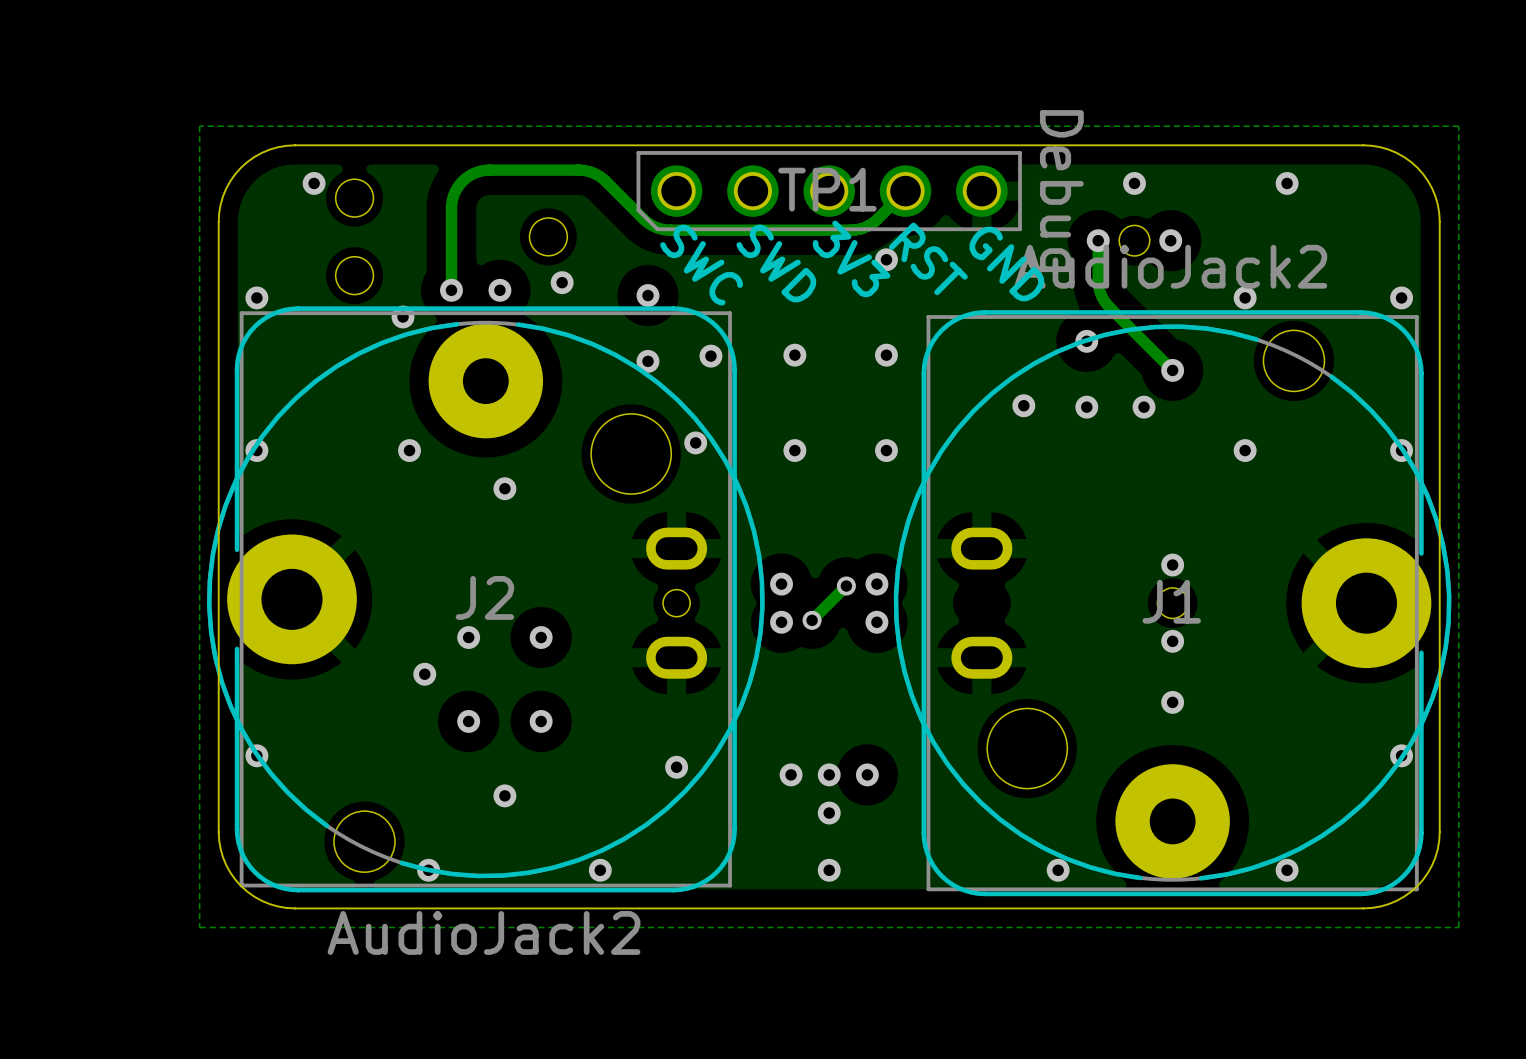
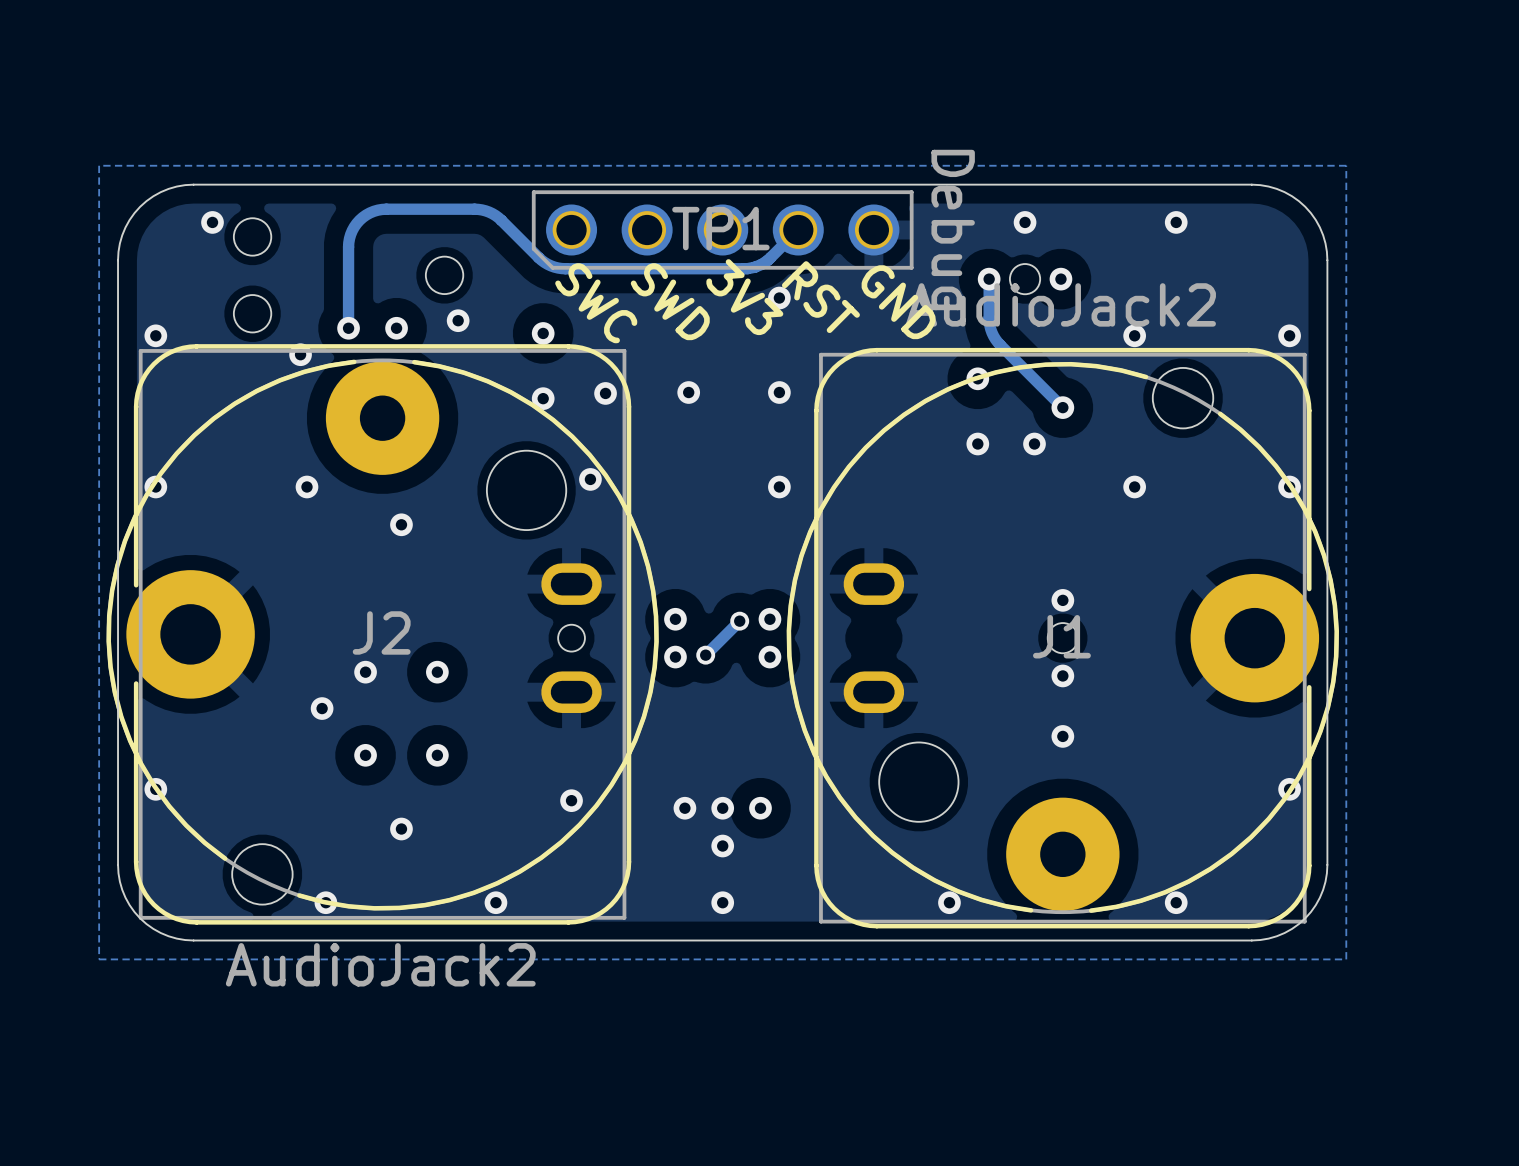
via: (1023, 405) -> none
via: (794, 450) -> none

